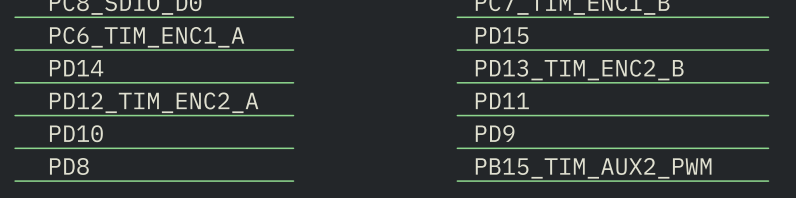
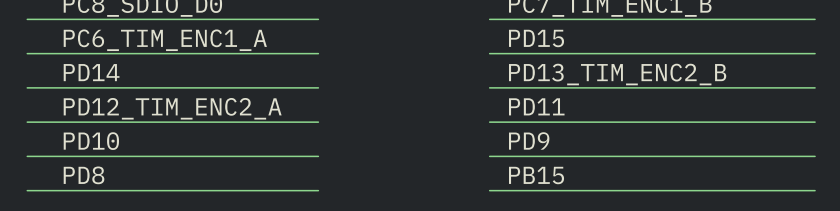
label: PB15_TIM_AUX2_PWM (593, 168) -> PB15 (536, 175)

